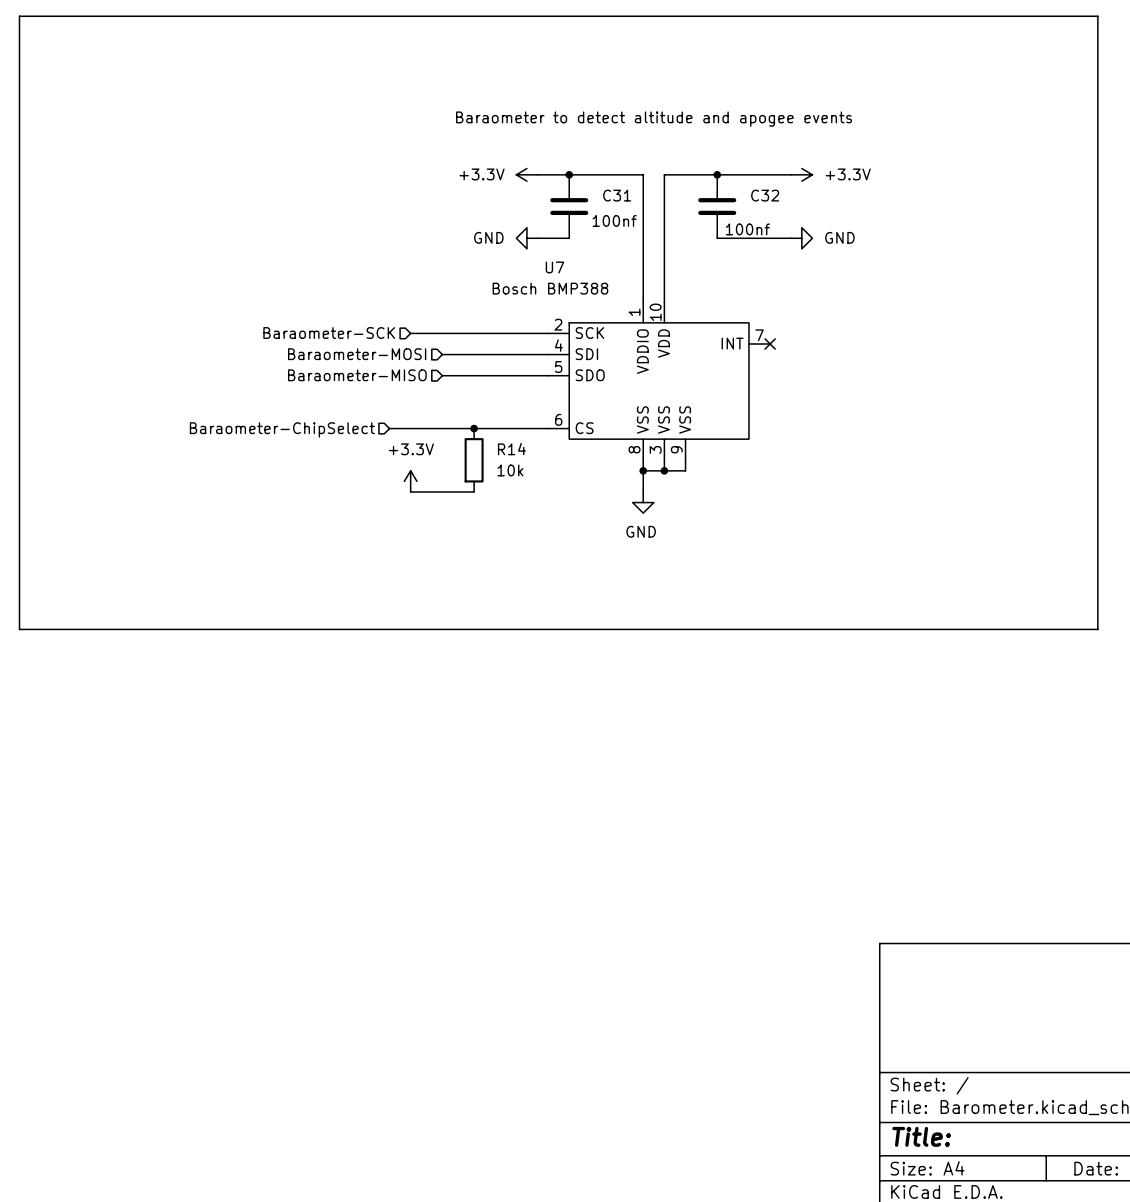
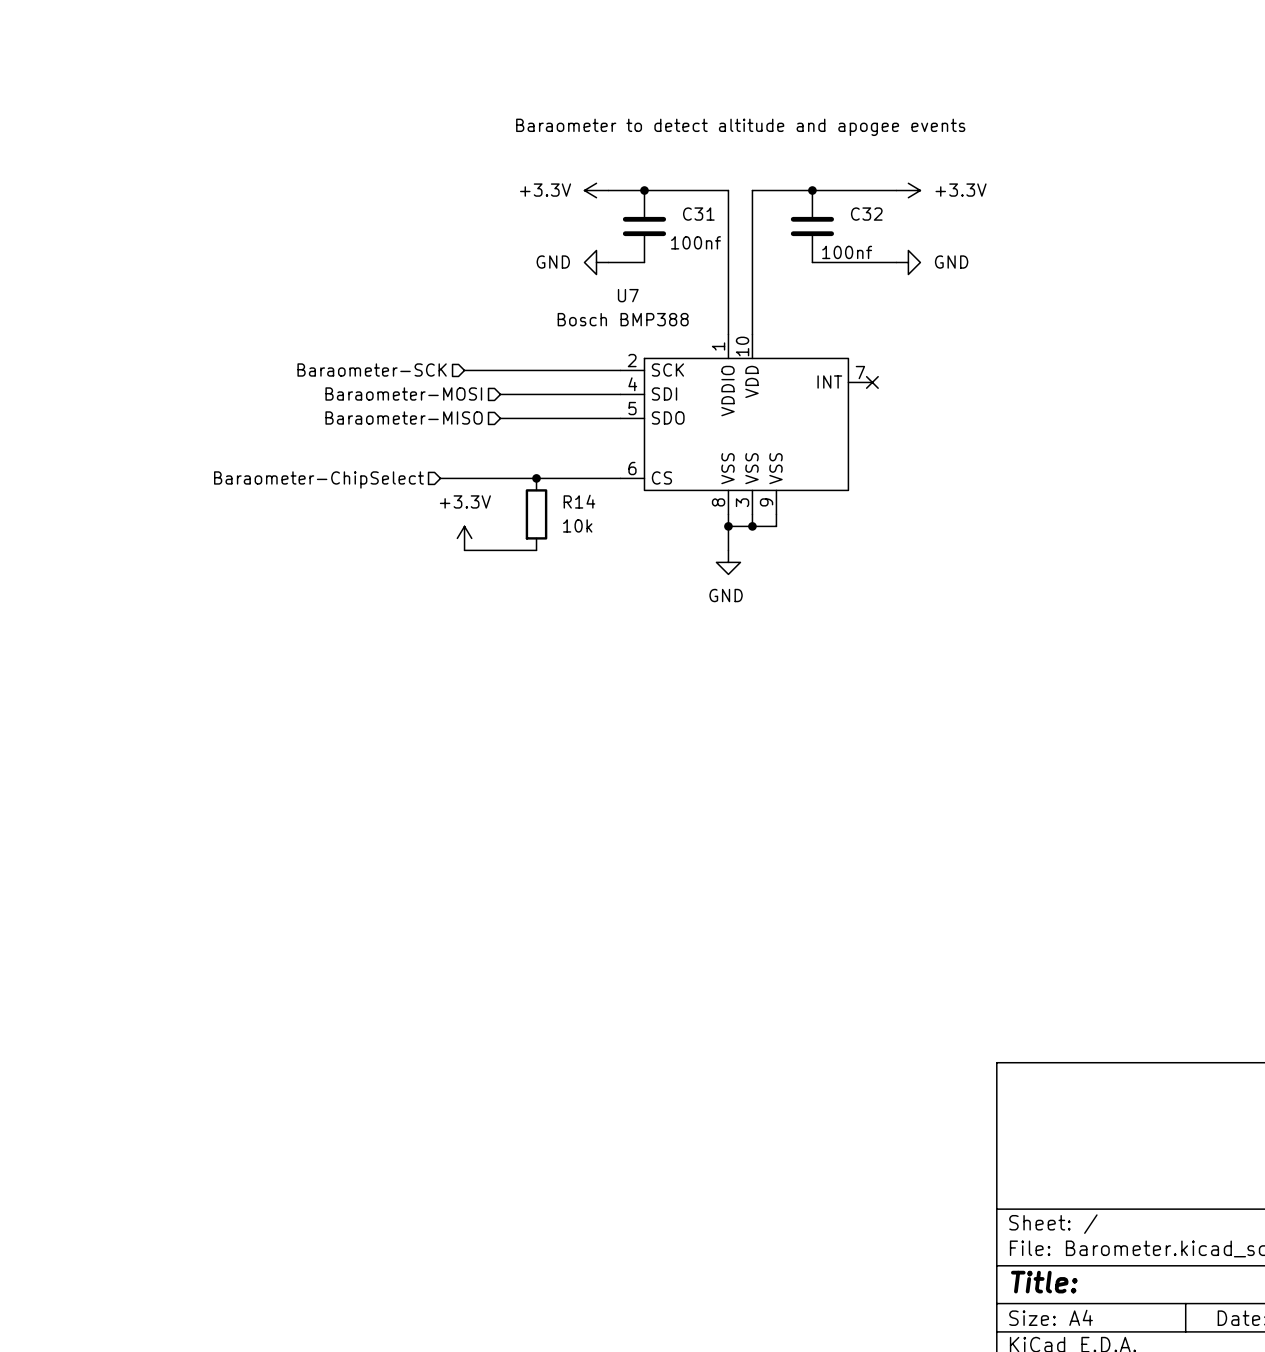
line: (19, 16) (1097, 16) (1097, 629) (19, 629) (19, 16) -> none

